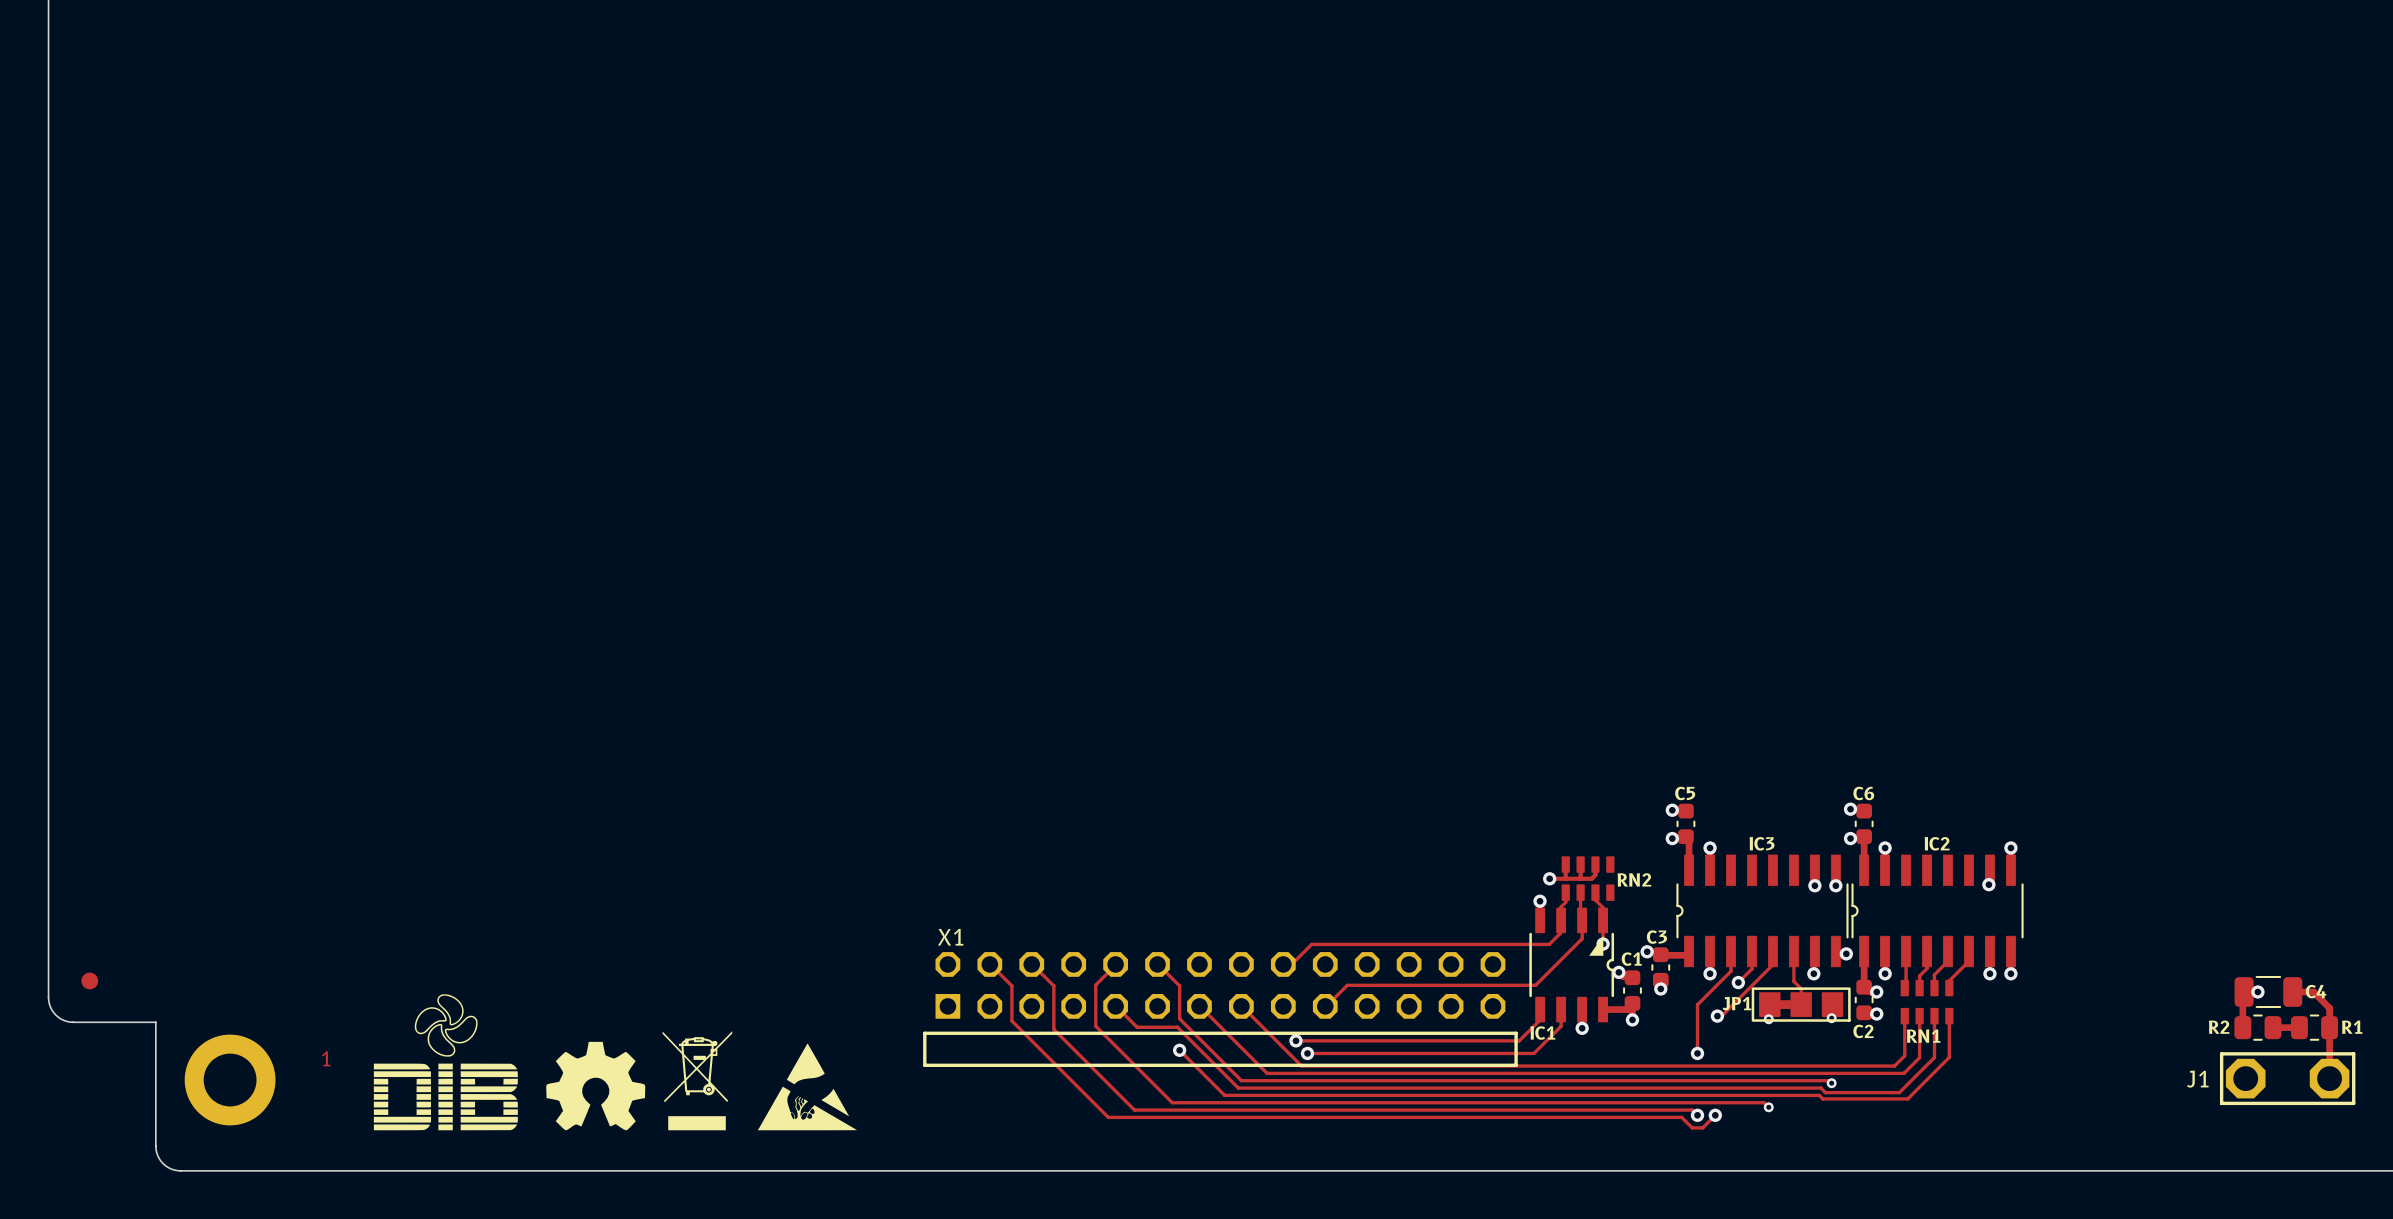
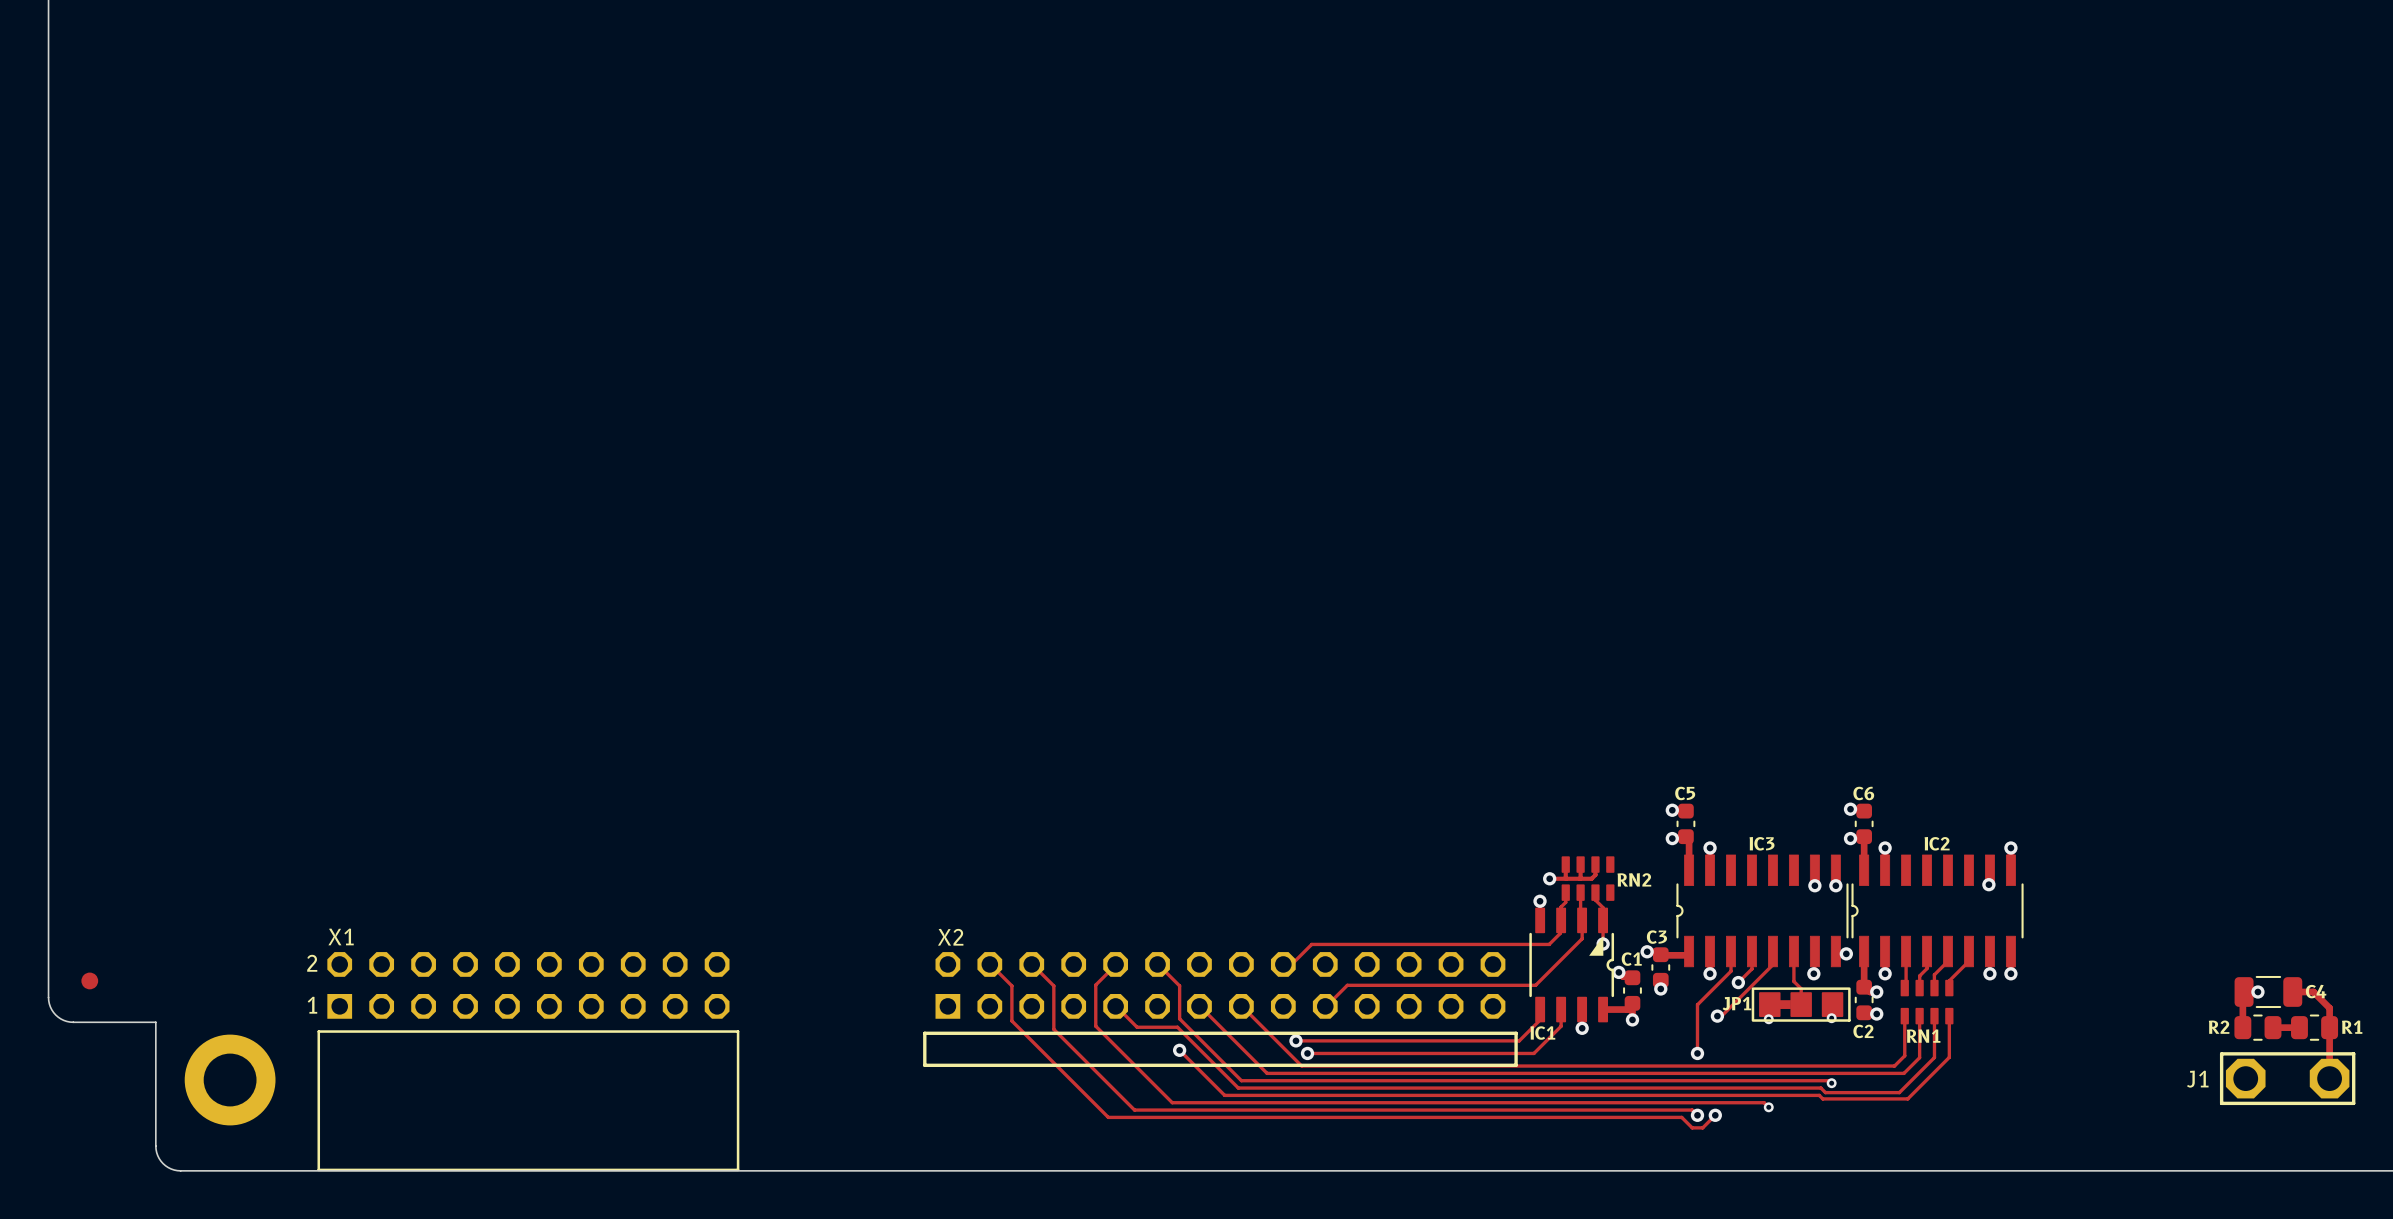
X1 name: X1 (950, 937) -> X2 (950, 937)
drawing: [373, 994, 518, 1131] -> none
drawing: [546, 1031, 733, 1131] -> none
drawing: [757, 1043, 857, 1131] -> none
text: 1 (326, 1058) -> none
X1: none -> (528, 1061)

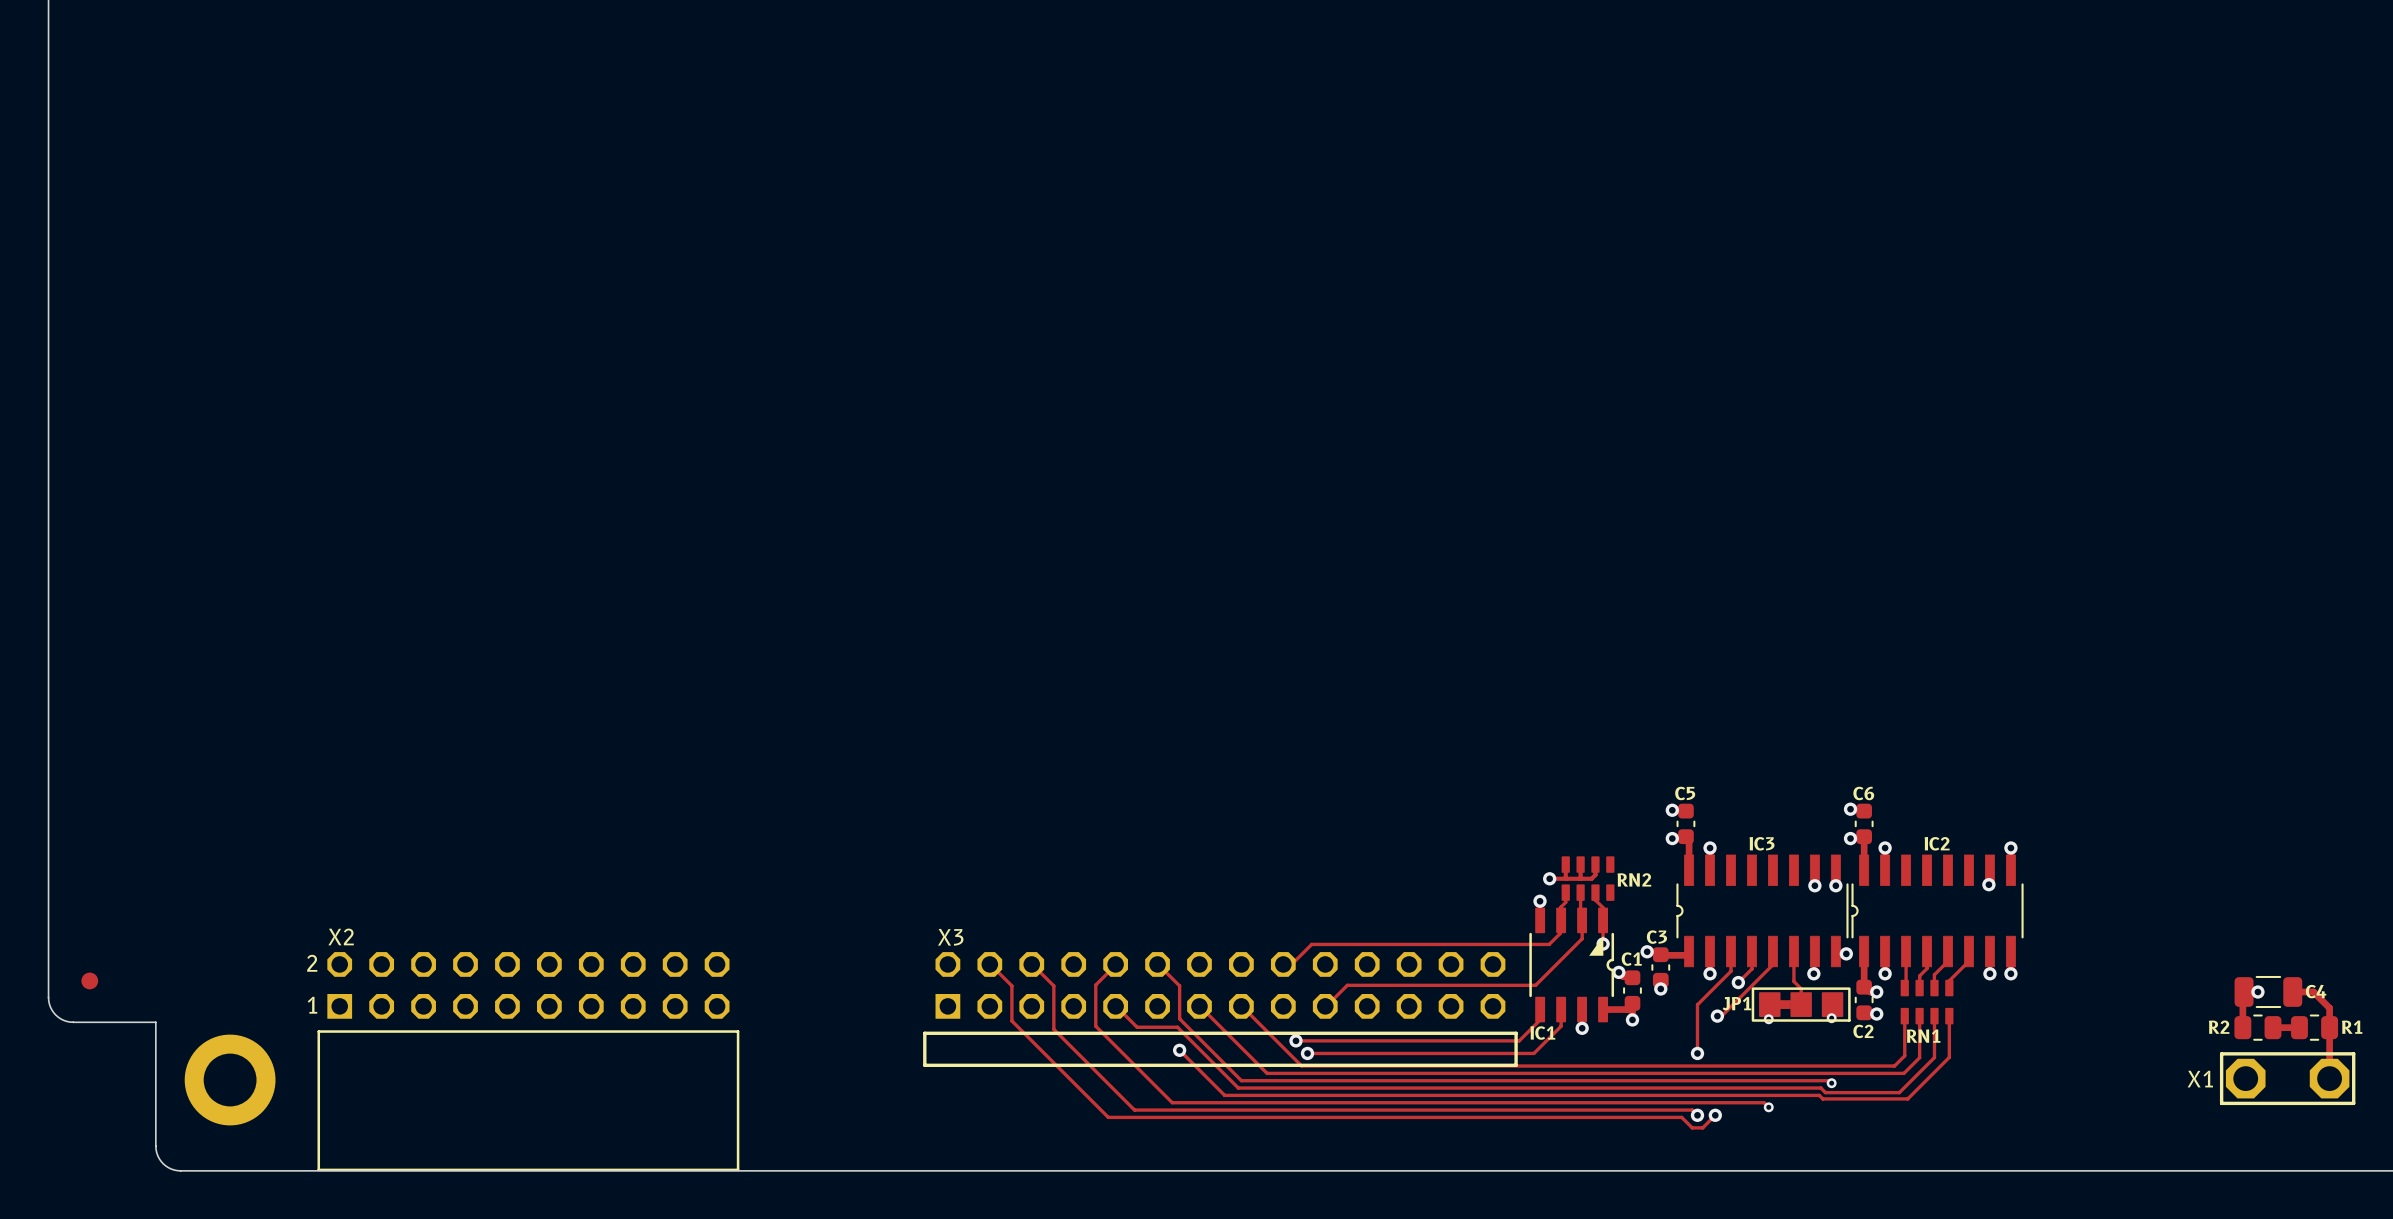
X1 name: X1 (341, 936) -> X2 (341, 936)
X2 name: X2 (950, 937) -> X3 (950, 937)
J1 name: J1 (2197, 1079) -> X1 (2200, 1079)

